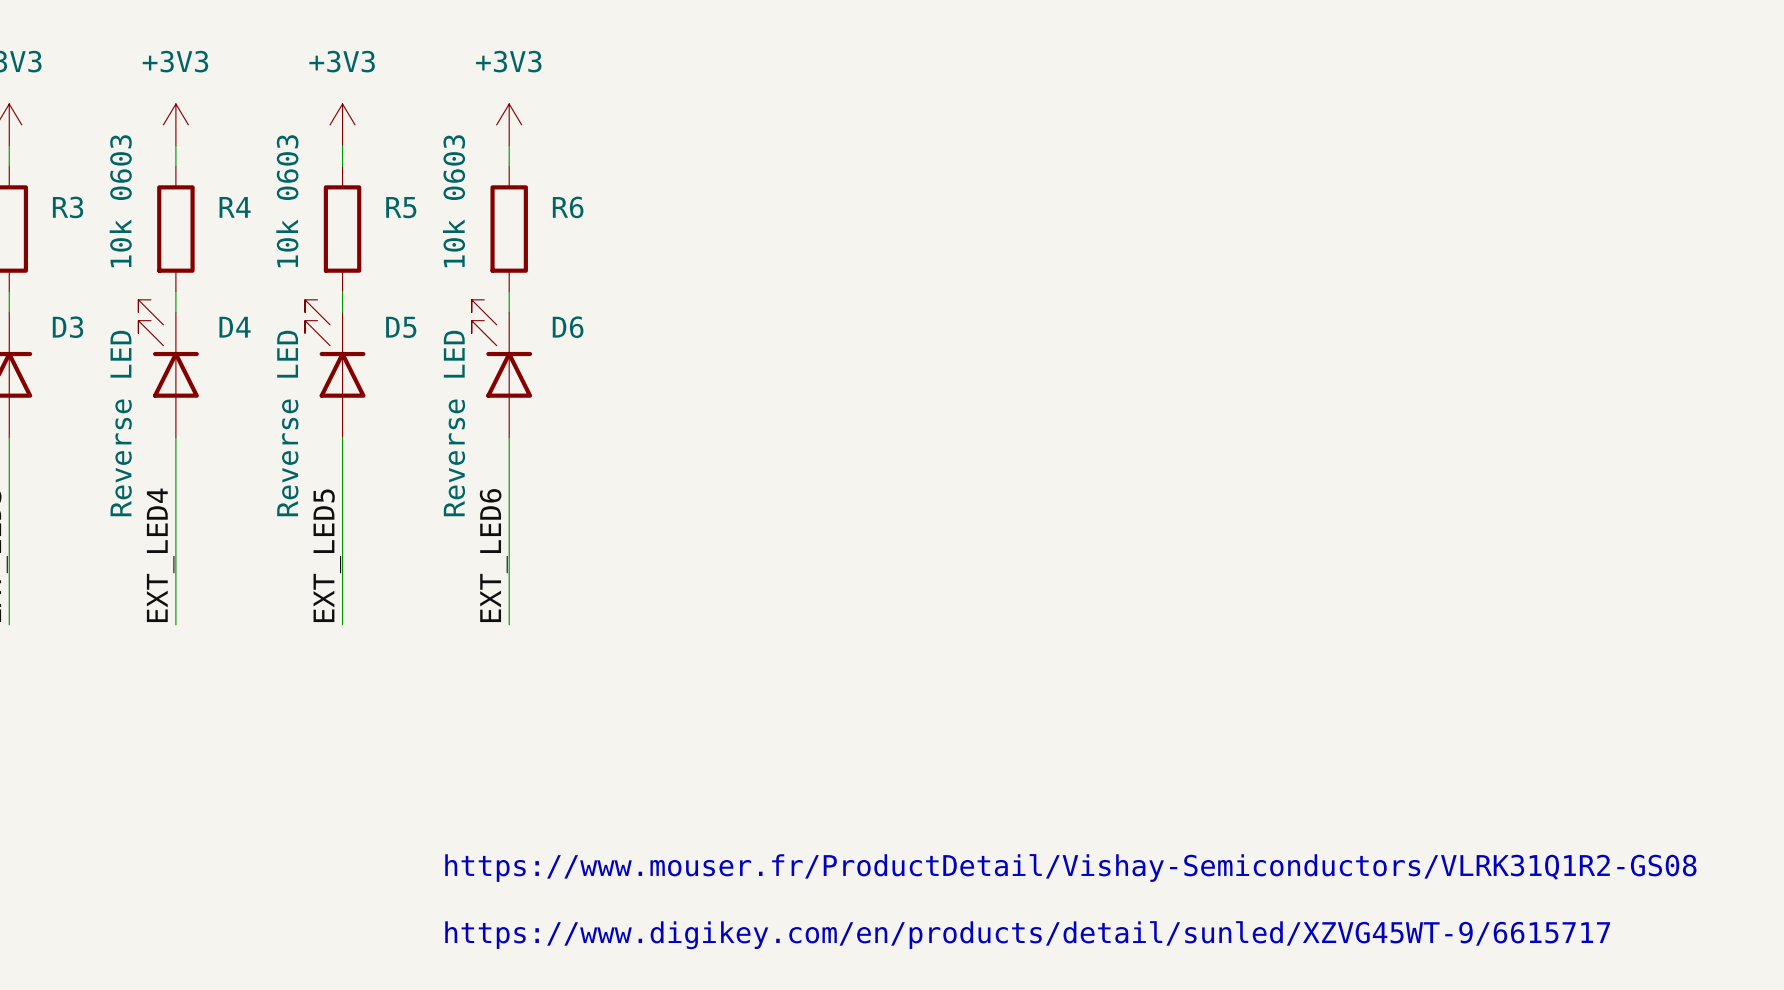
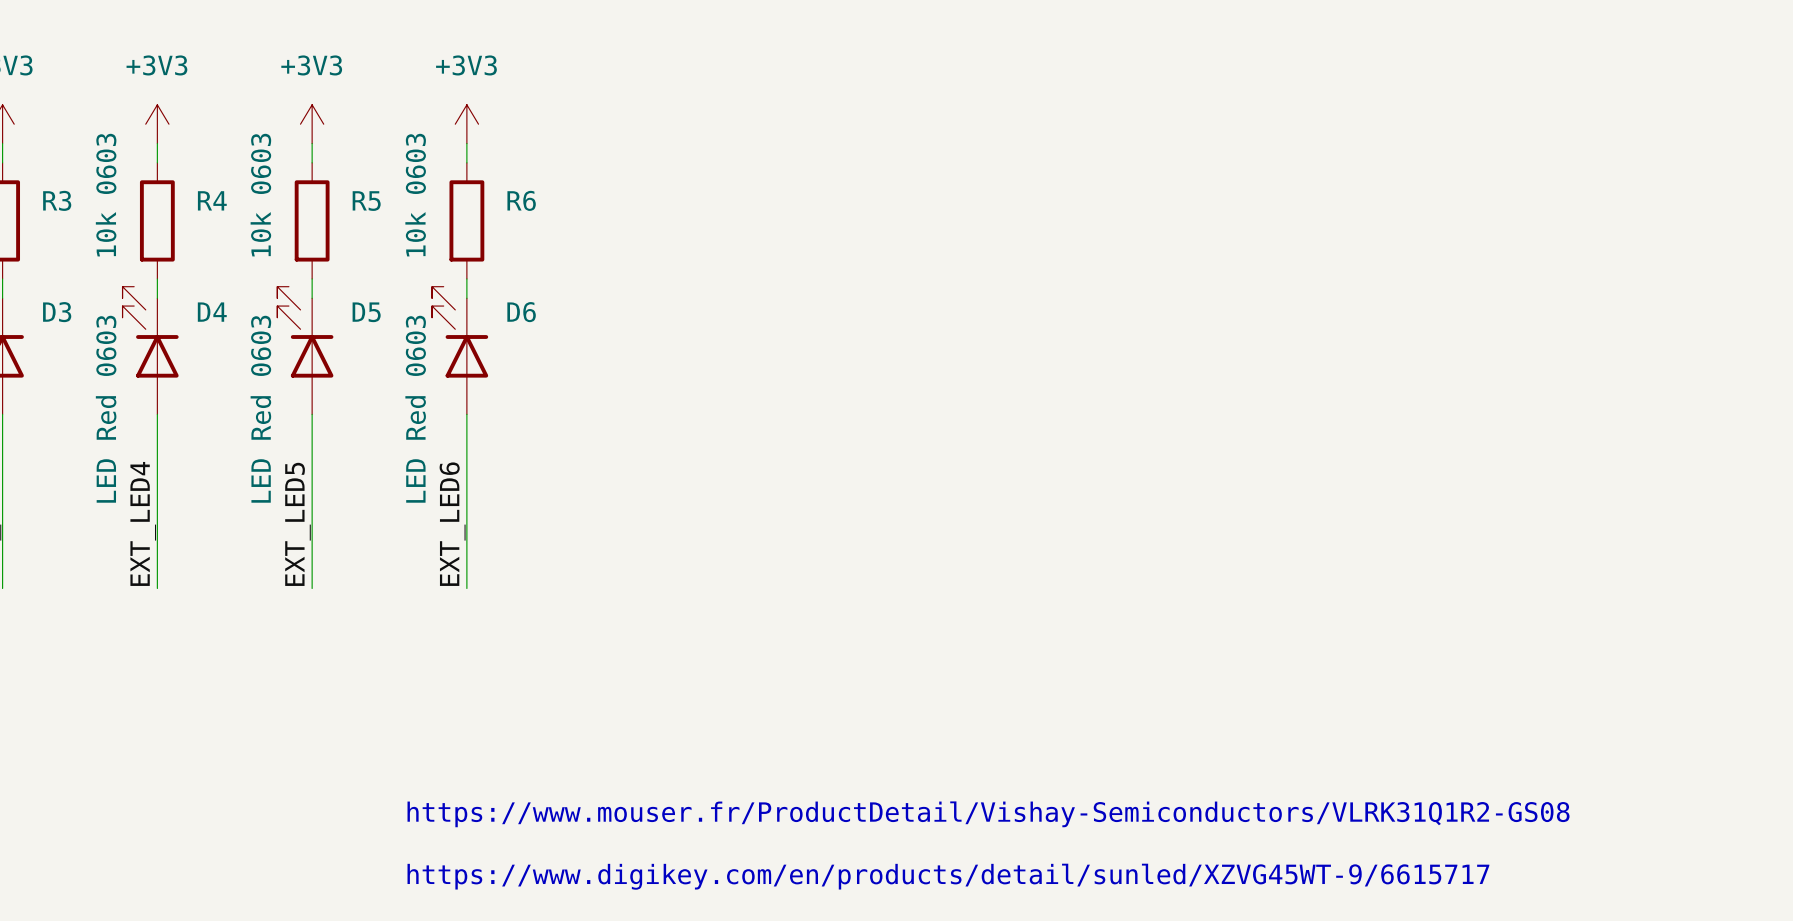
D4 value: Reverse LED (121, 423) -> LED Red 0603 (106, 409)
D5 value: Reverse LED (287, 423) -> LED Red 0603 (260, 409)
D6 value: Reverse LED (454, 423) -> LED Red 0603 (415, 409)

